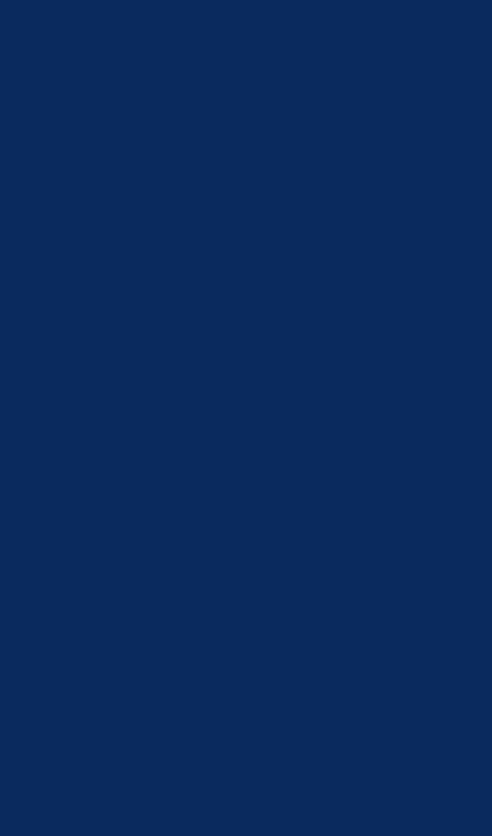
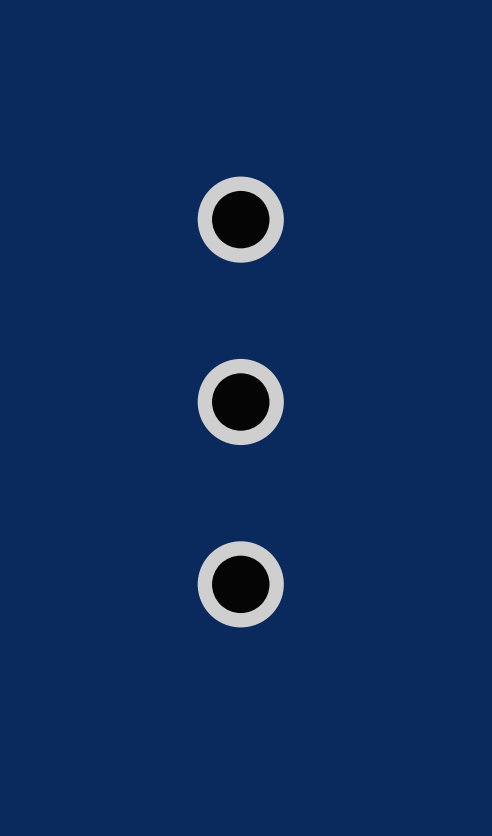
part: none -> (240, 401)

